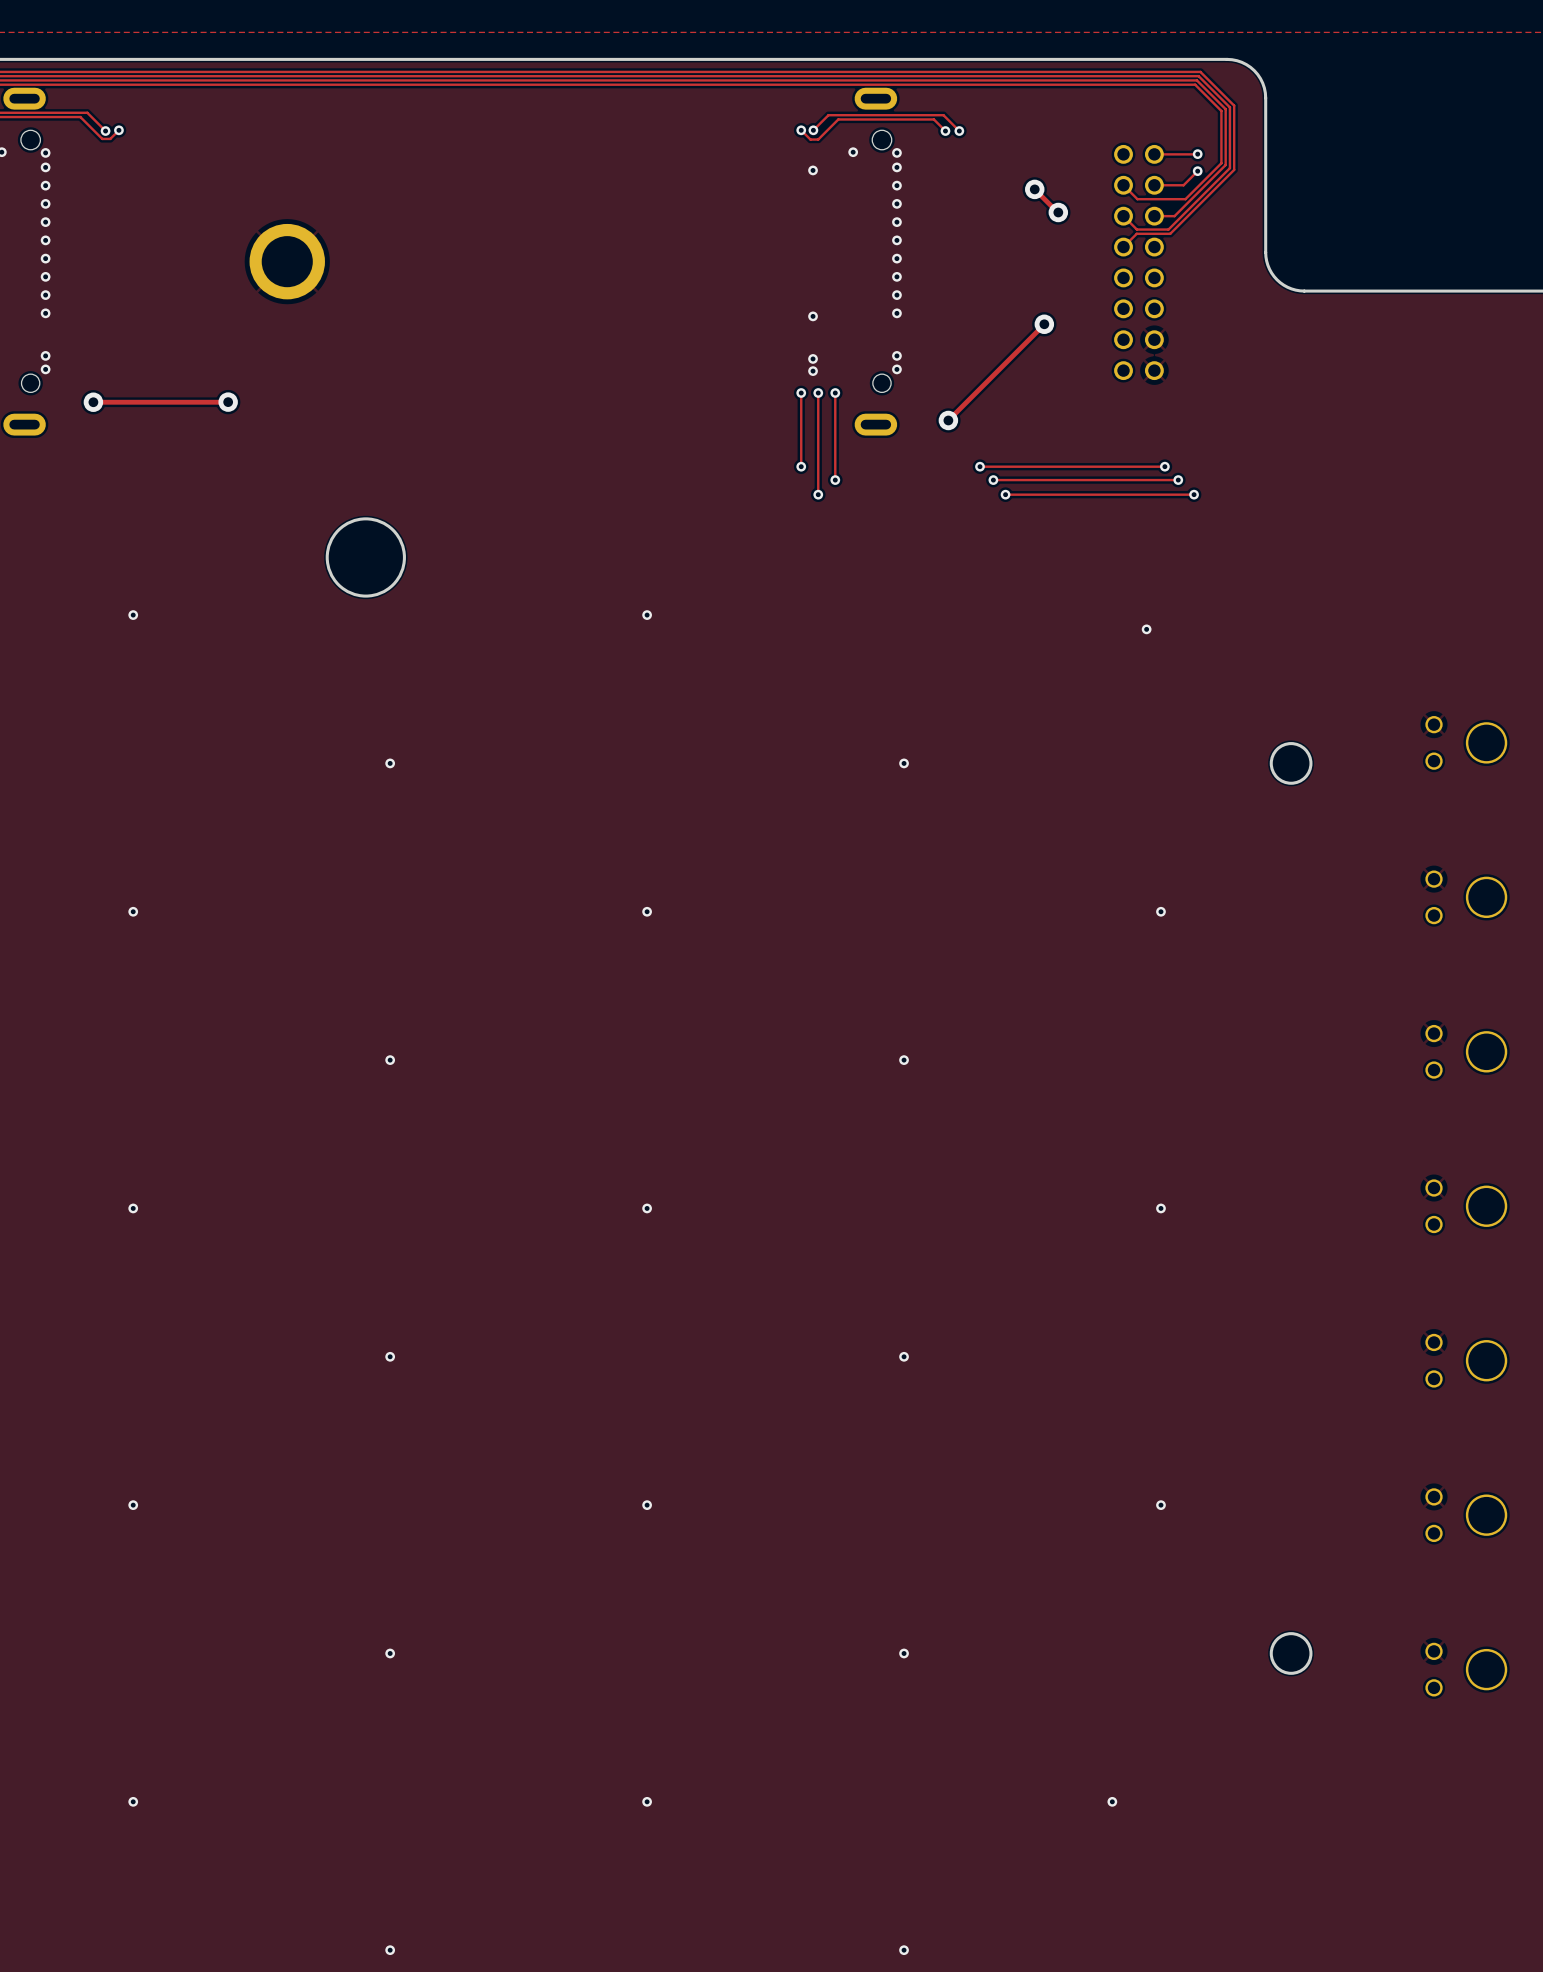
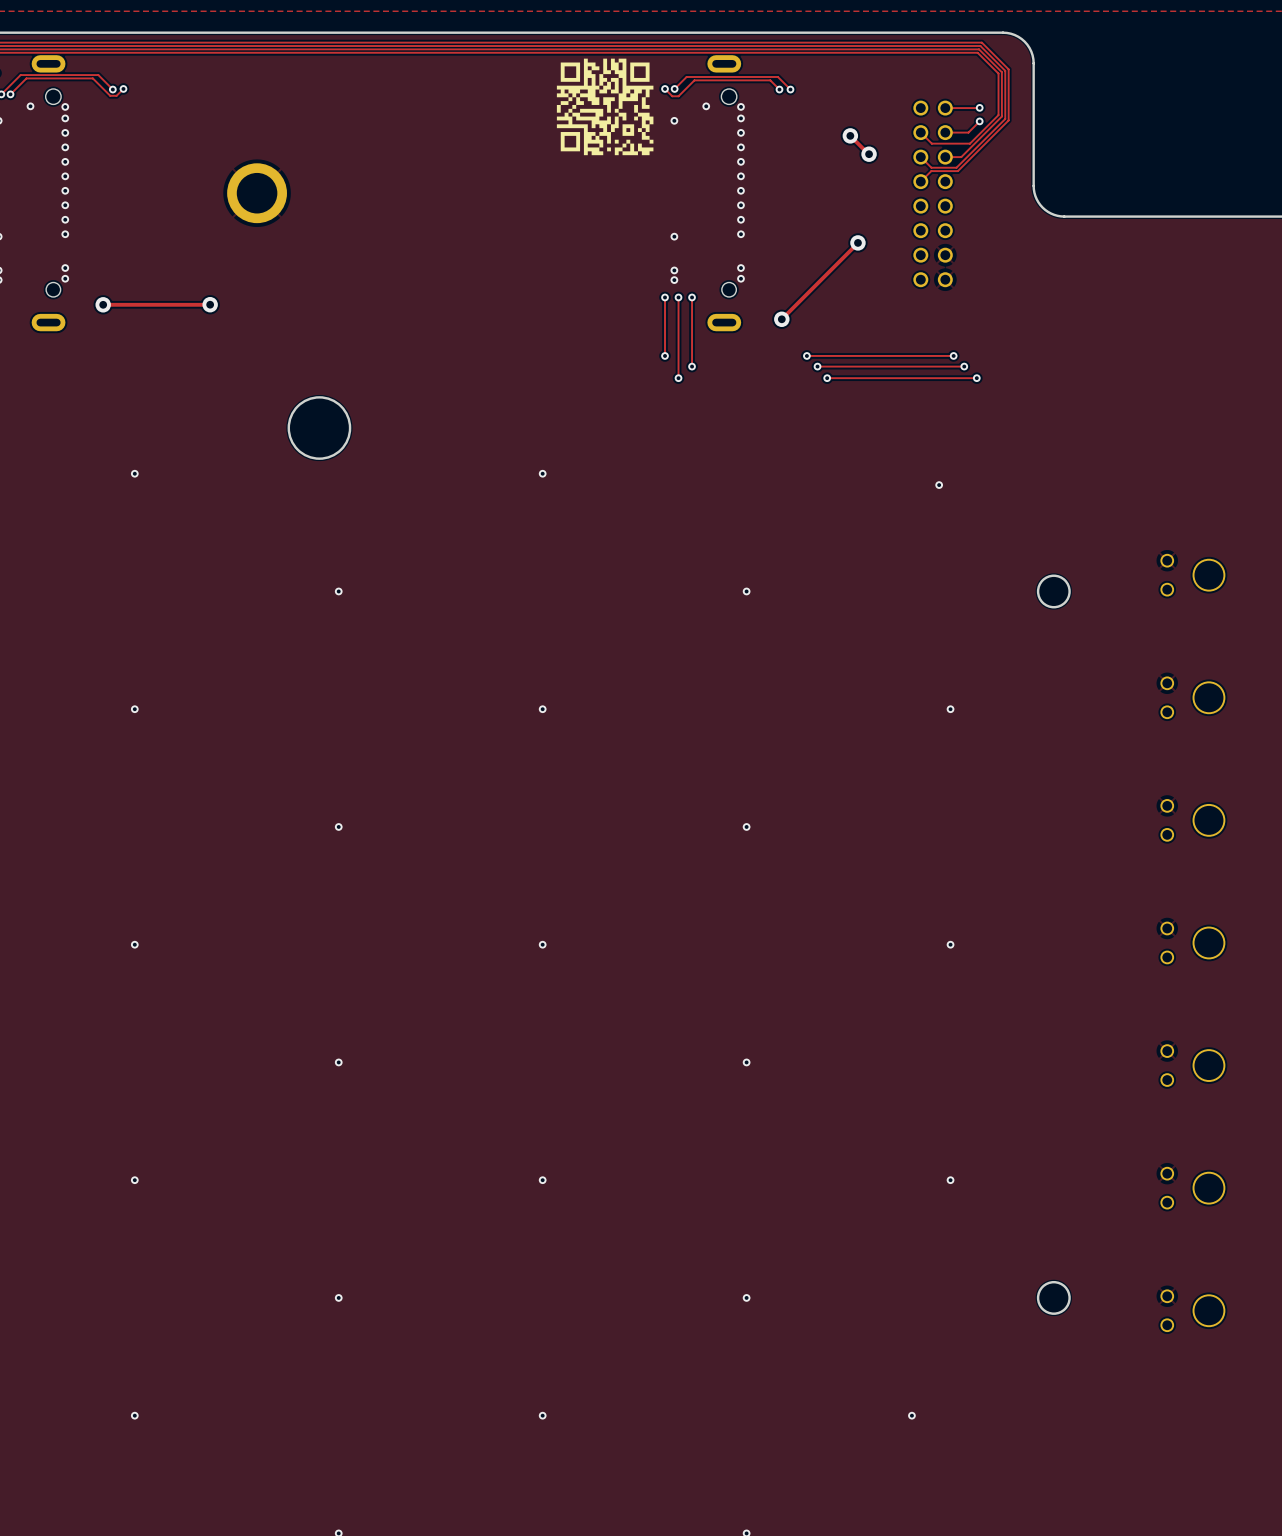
drawing: none -> [556, 58, 654, 156]

